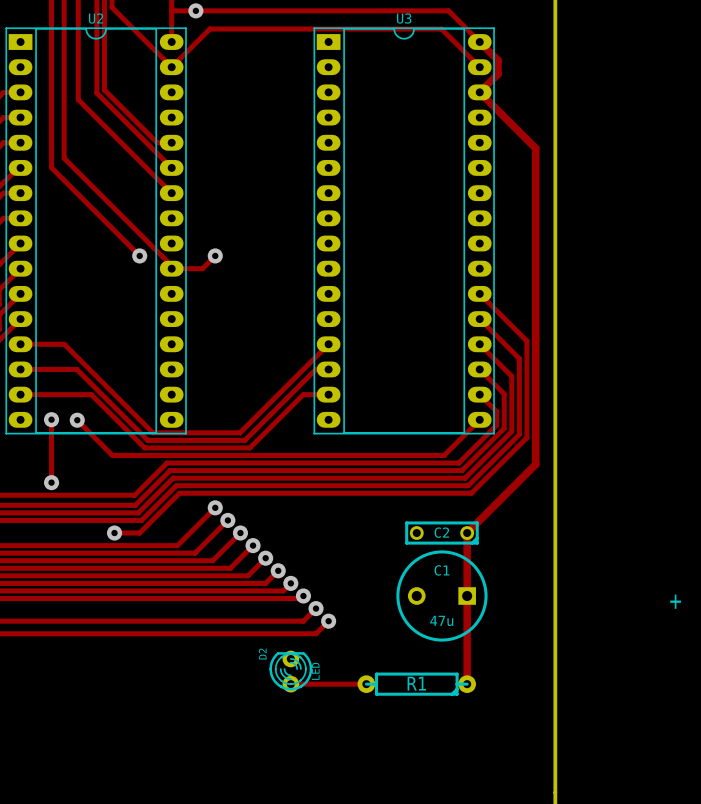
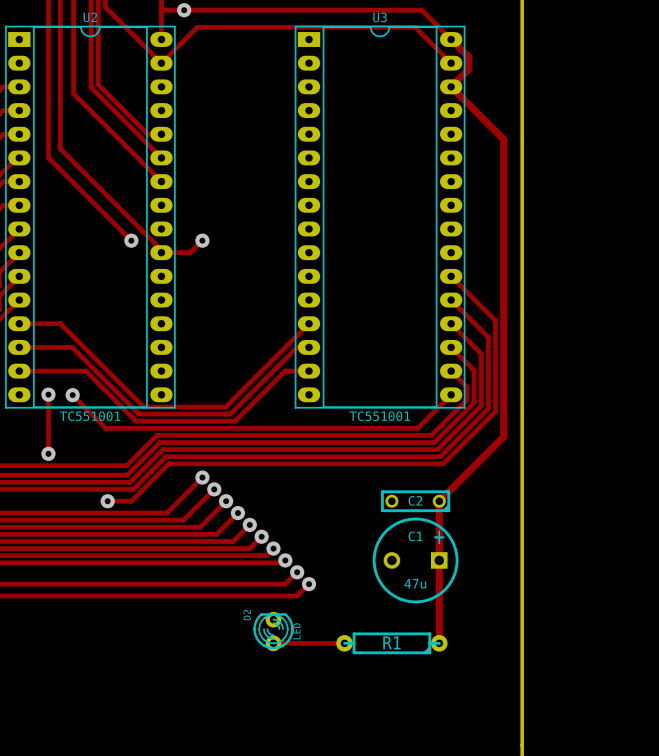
U2 value: none -> TC551001 (90, 416)
U3 value: none -> TC551001 (379, 416)
text position: + (675, 601) -> + (439, 537)

